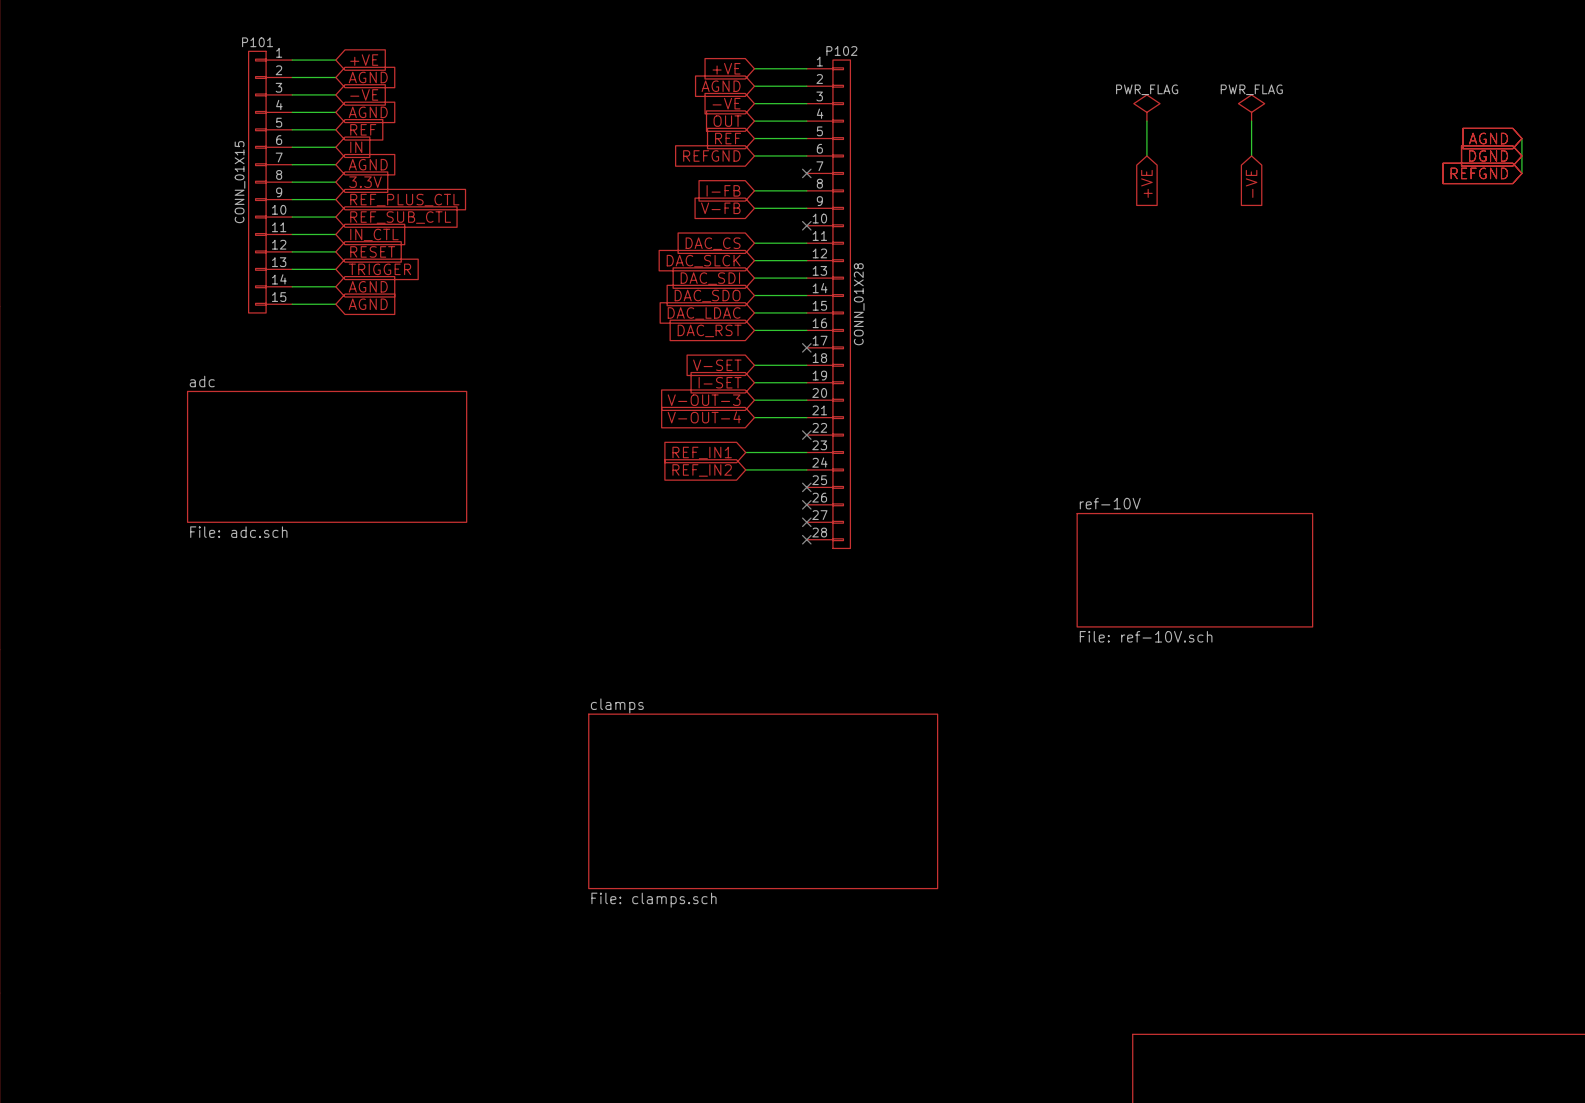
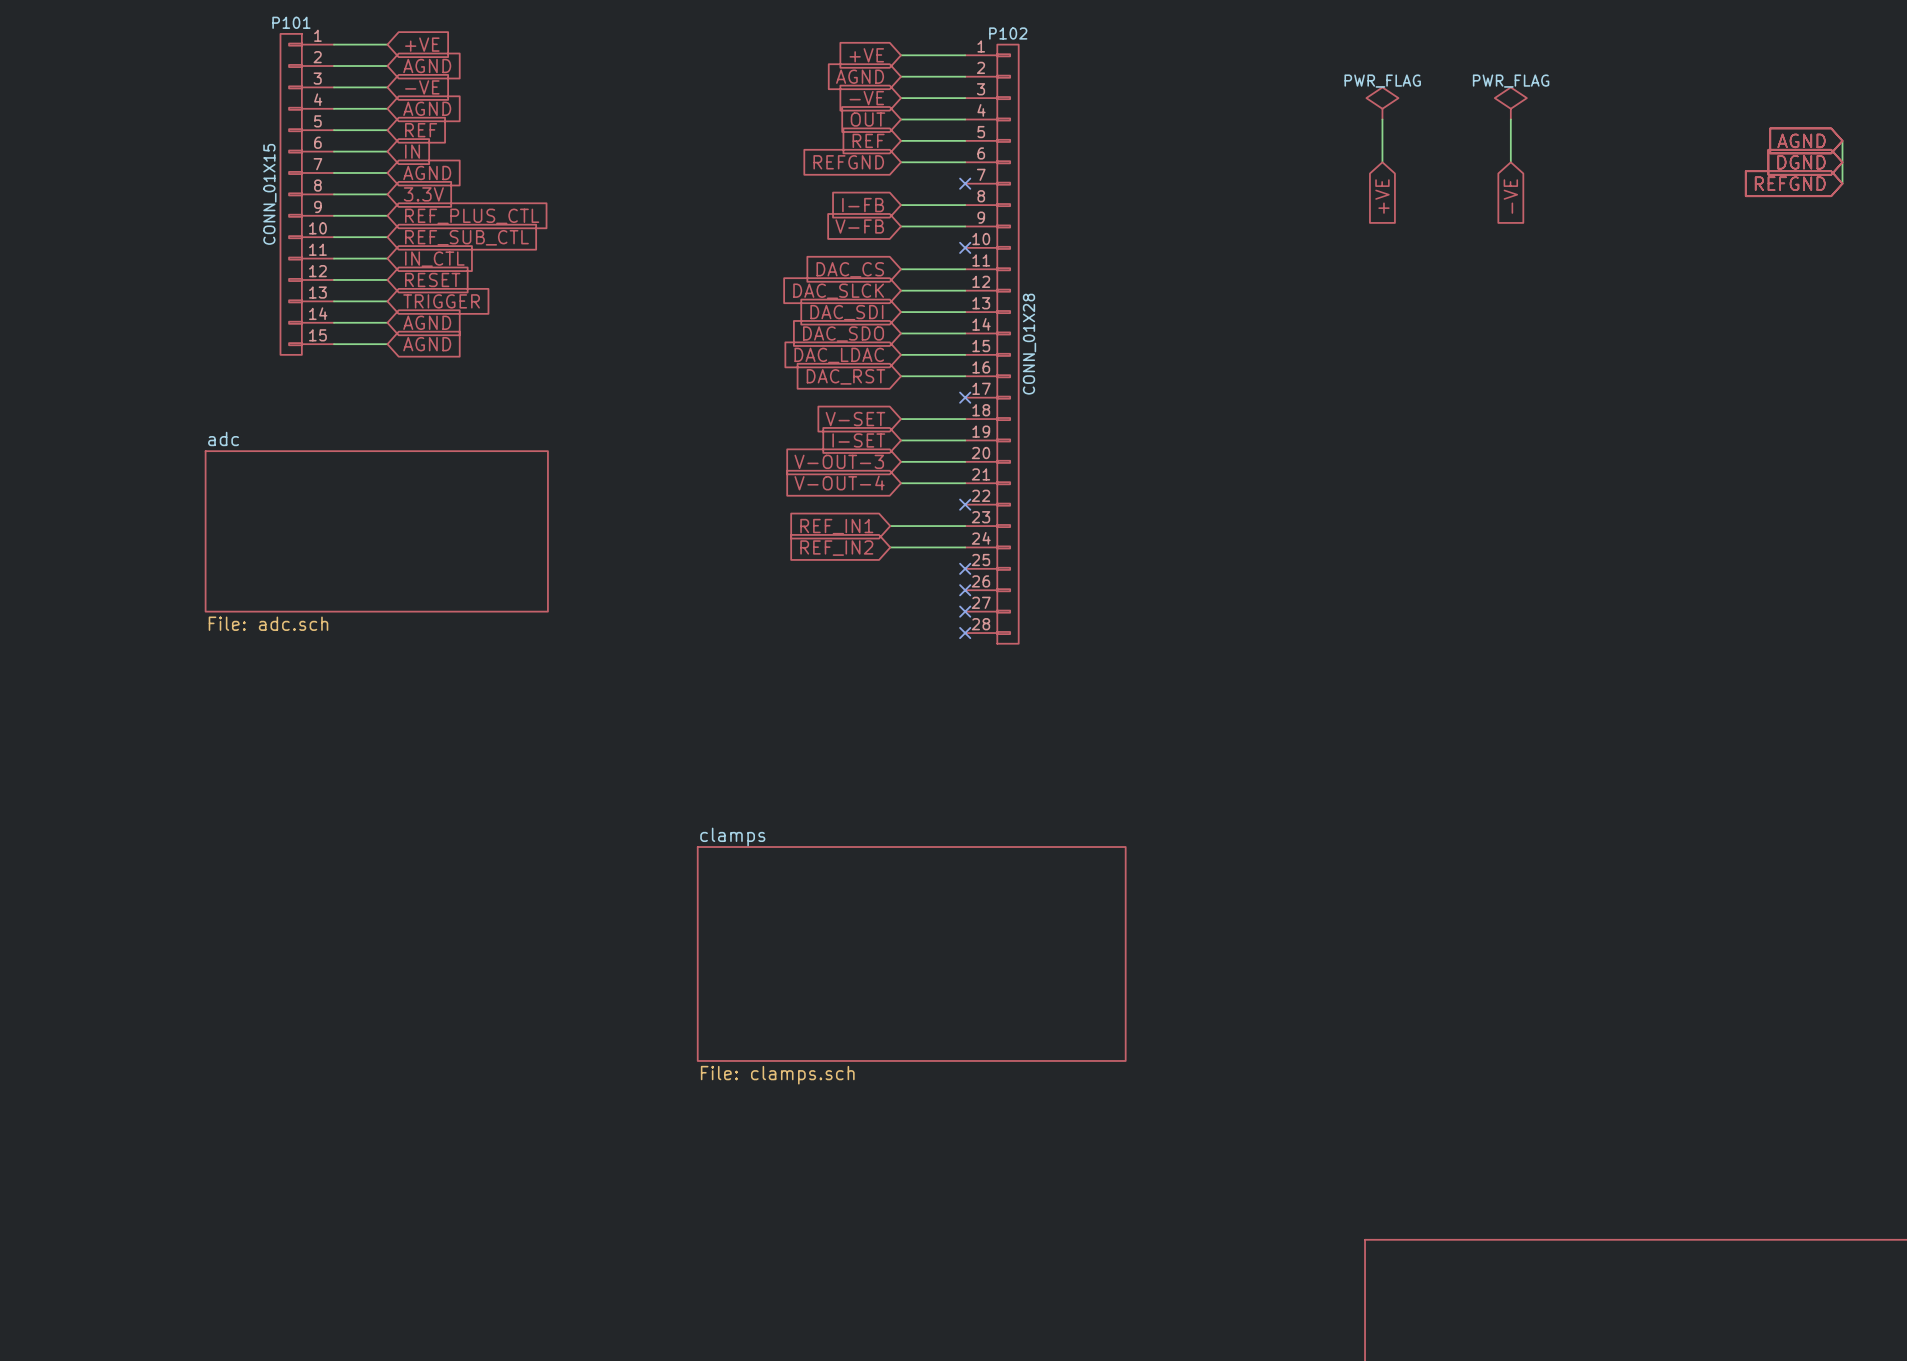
sheet ref-10V: File: ref-10V.sch (1194, 570) -> none

